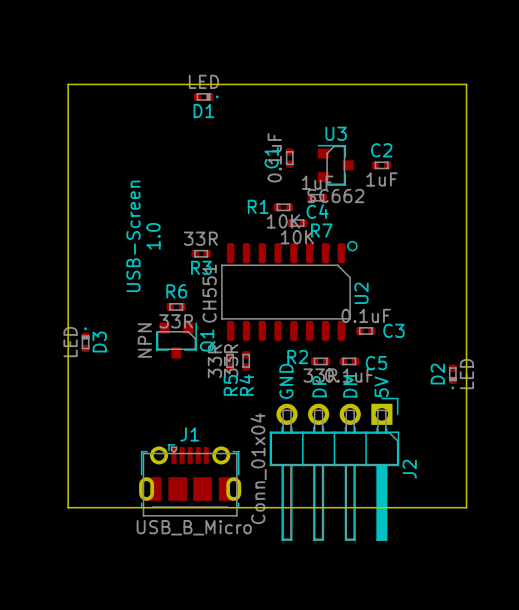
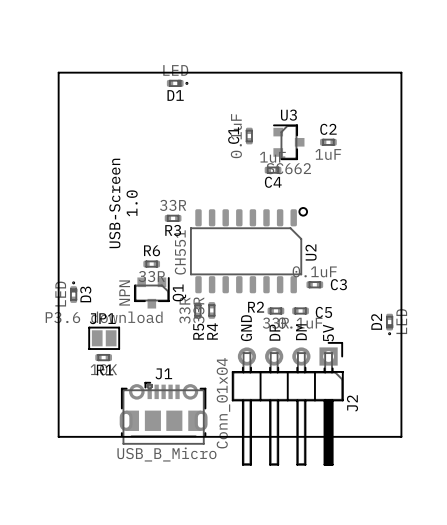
R1 name position: R1 (258, 206) -> R1 (105, 370)
R1 position: (283, 207) -> (103, 357)
R7: 10K (297, 223) -> none
JP1: none -> P3.6 download (104, 338)

